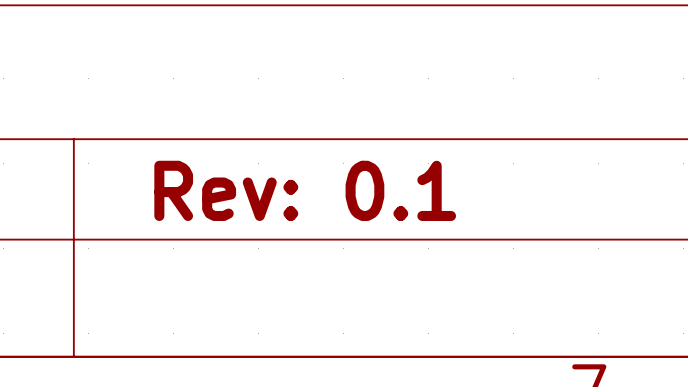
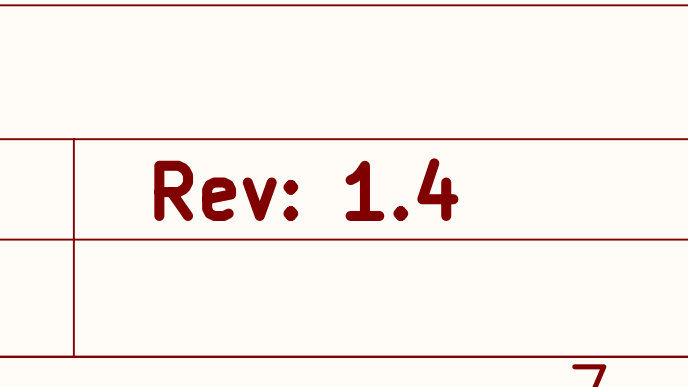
title block: Rev: 0.1 (305, 190) -> Rev: 1.4 (306, 189)

